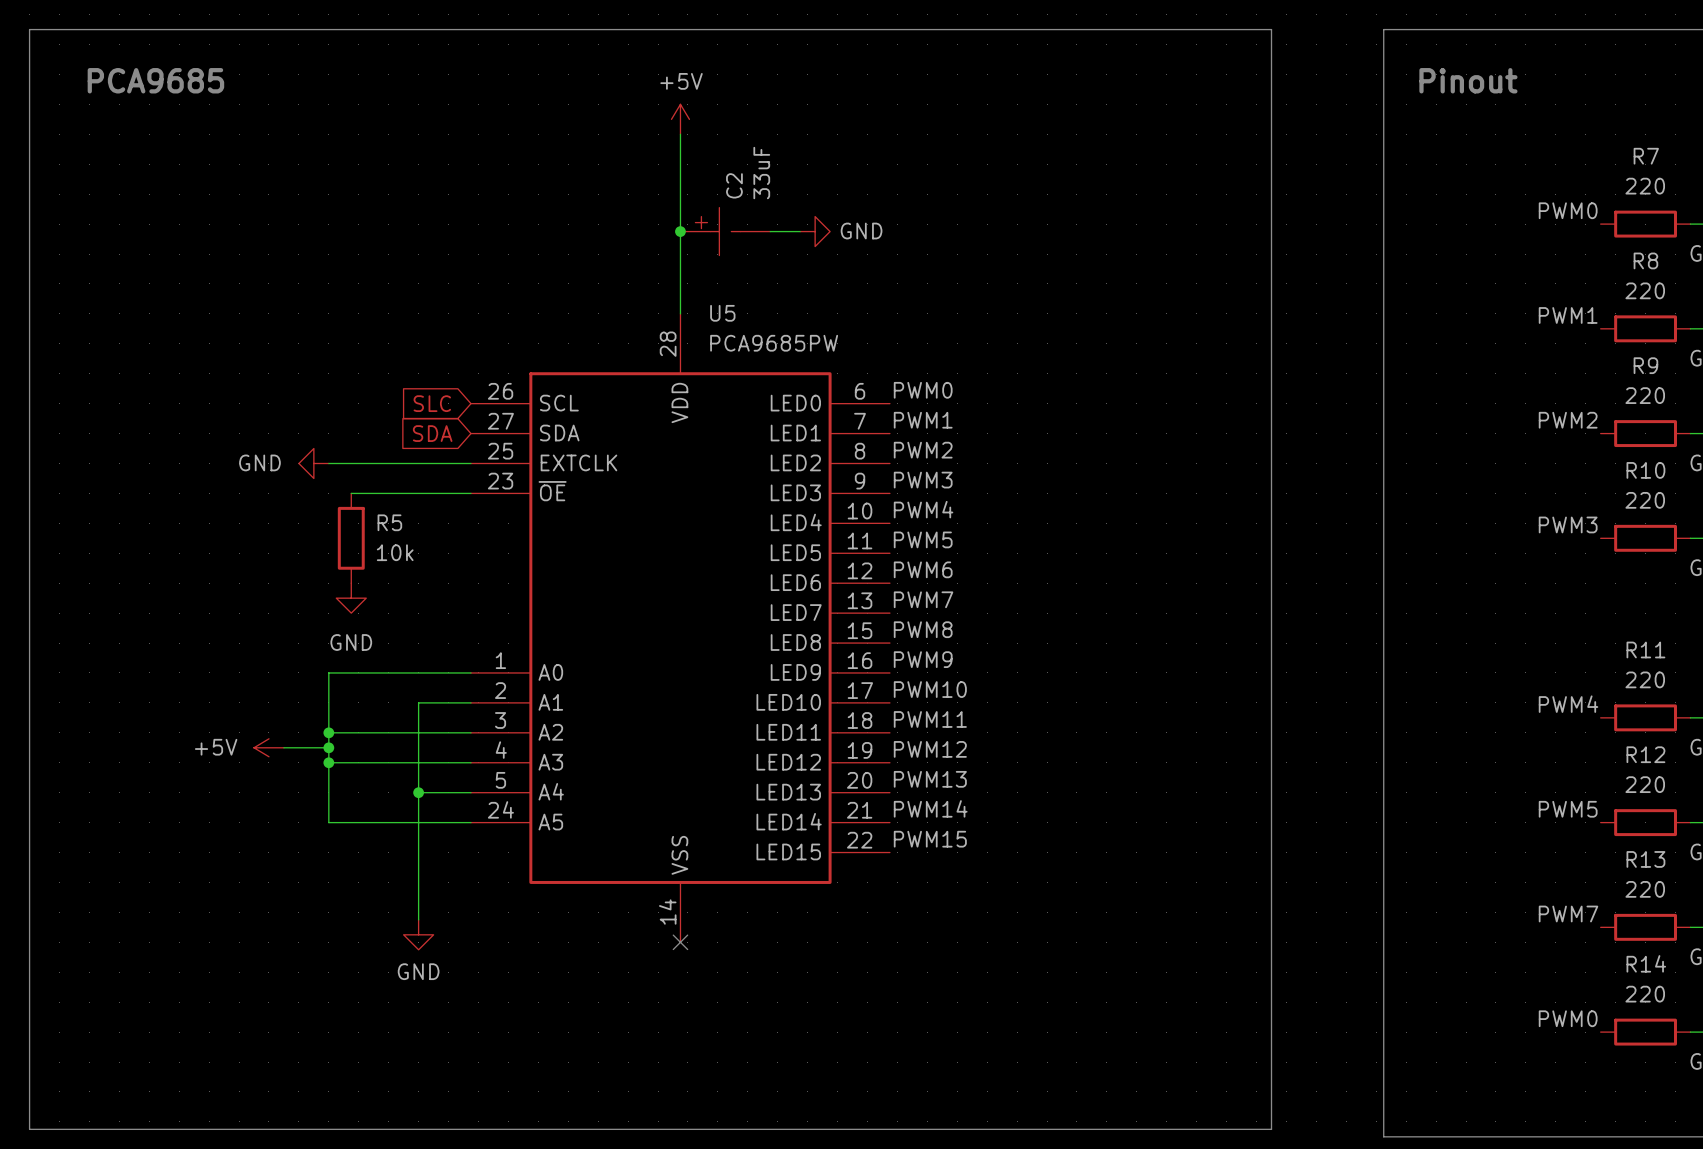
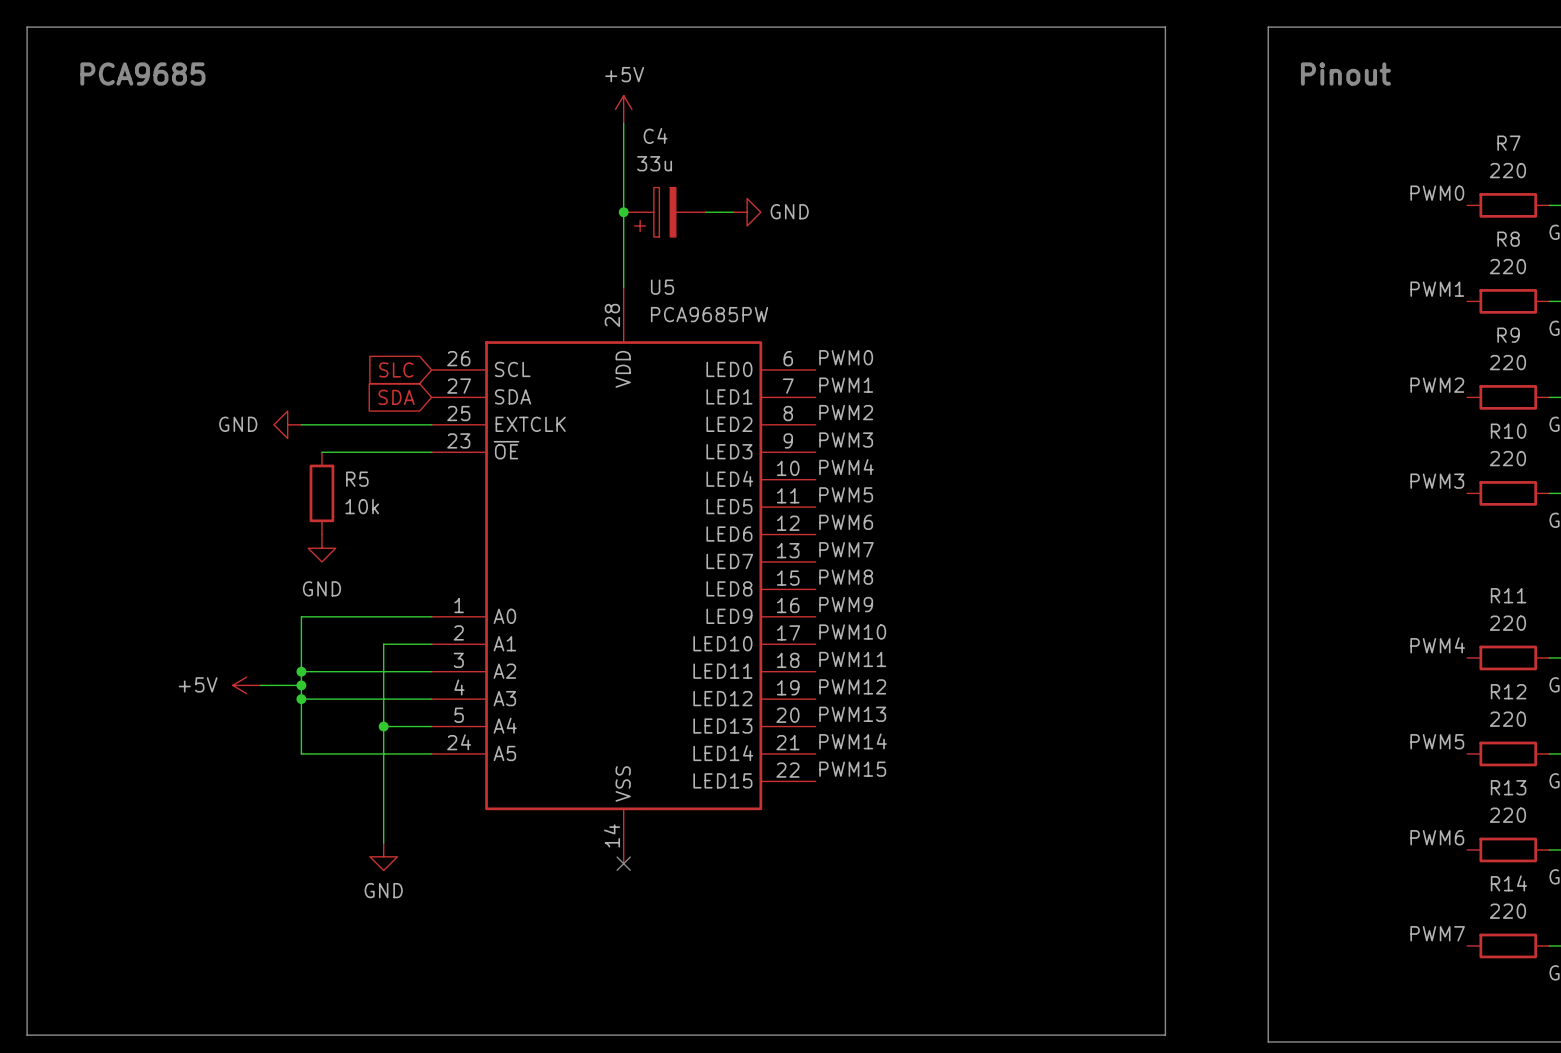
C2: 33uF (725, 231) -> none
C4: none -> 33u (664, 212)
label: PWM7 (1568, 914) -> PWM6 (1437, 837)
label: PWM0 (1568, 1018) -> PWM7 (1437, 933)

